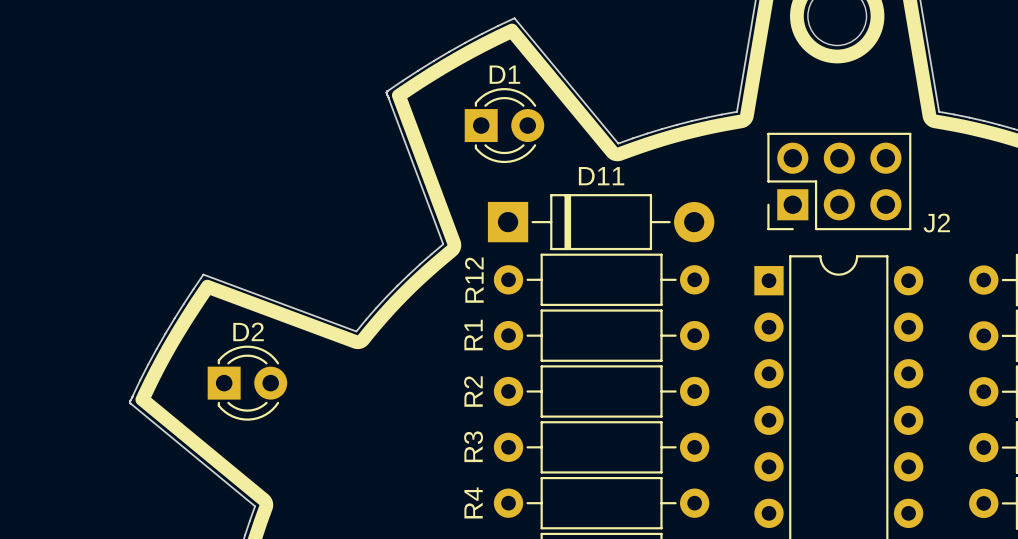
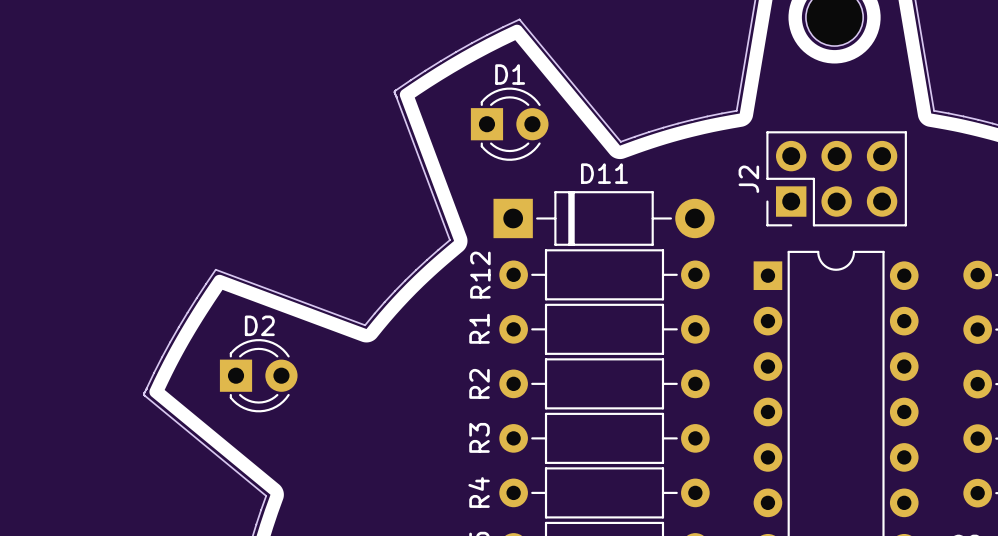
J2 name rotation: 0° (936, 223) -> 90° counterclockwise (748, 179)
J2 name position: J2 (936, 223) -> J2 (748, 179)

